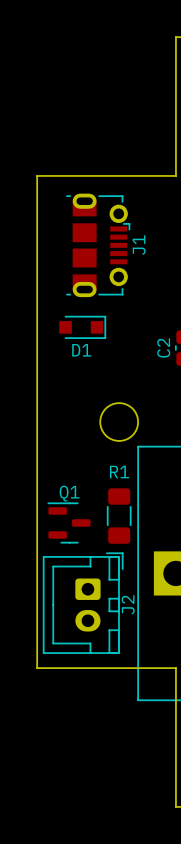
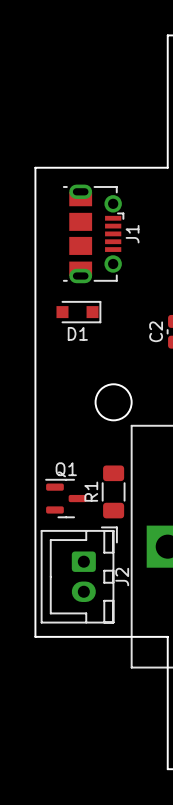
R1 name rotation: 0° (119, 472) -> 90° counterclockwise (91, 491)
R1 name position: R1 (119, 472) -> R1 (91, 491)

